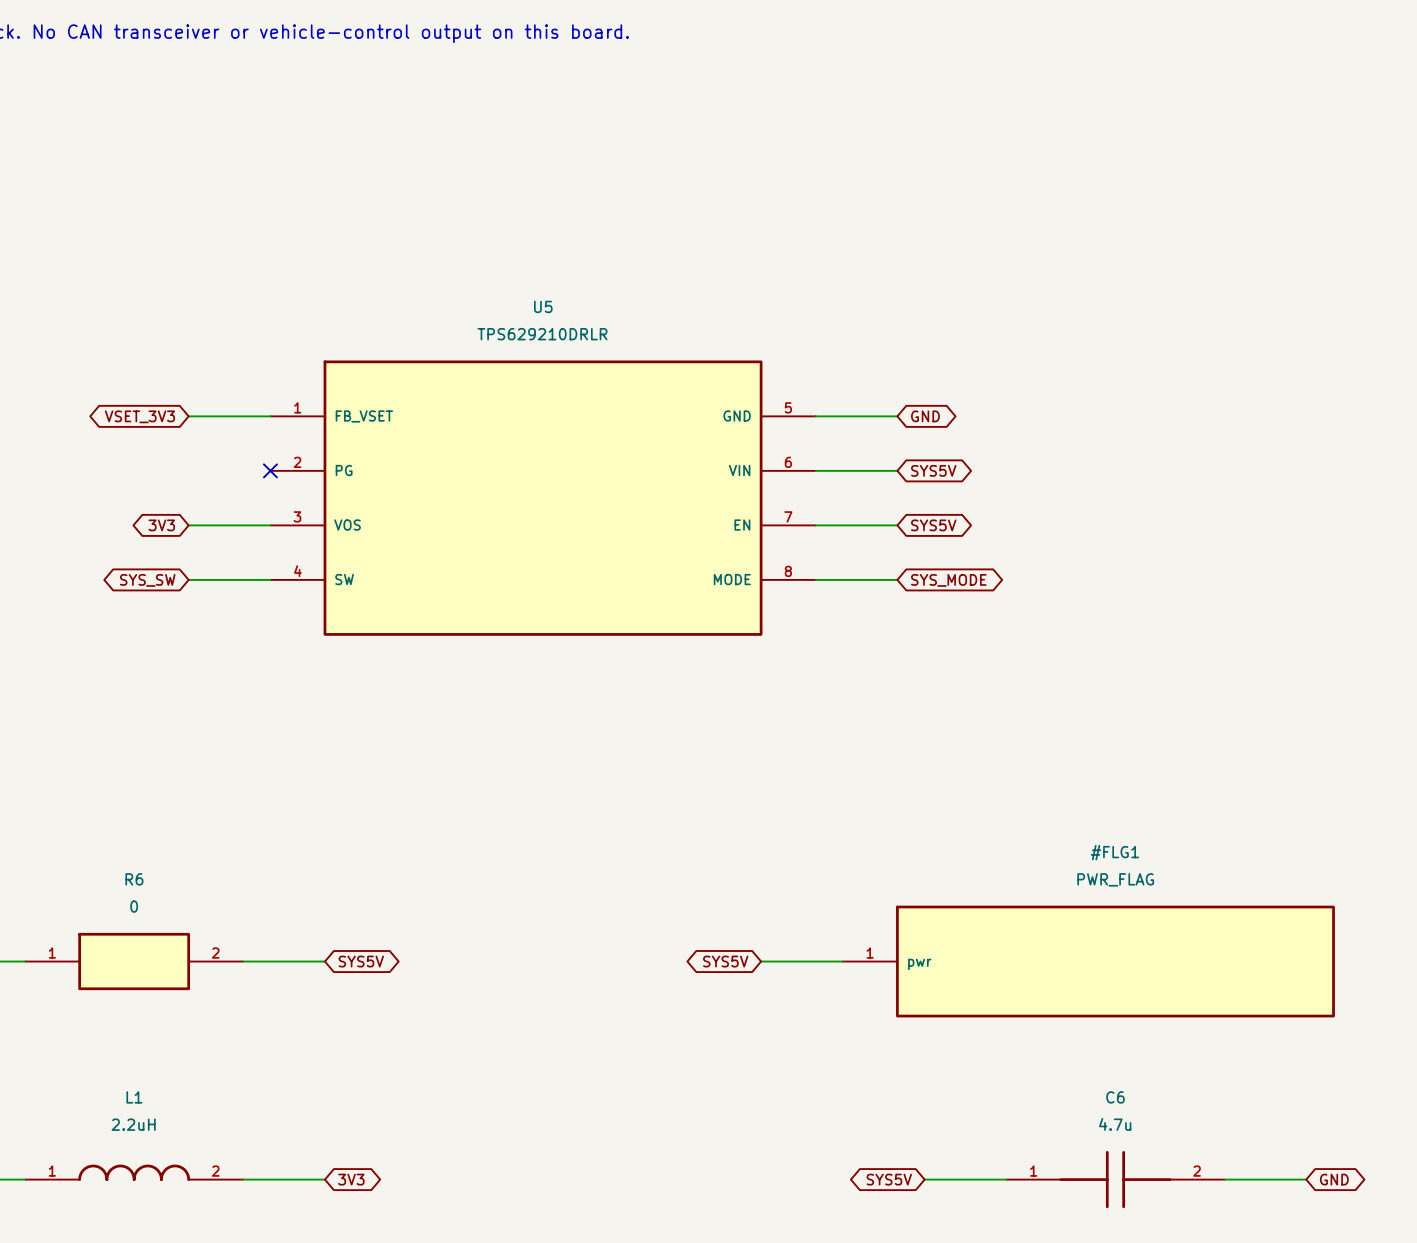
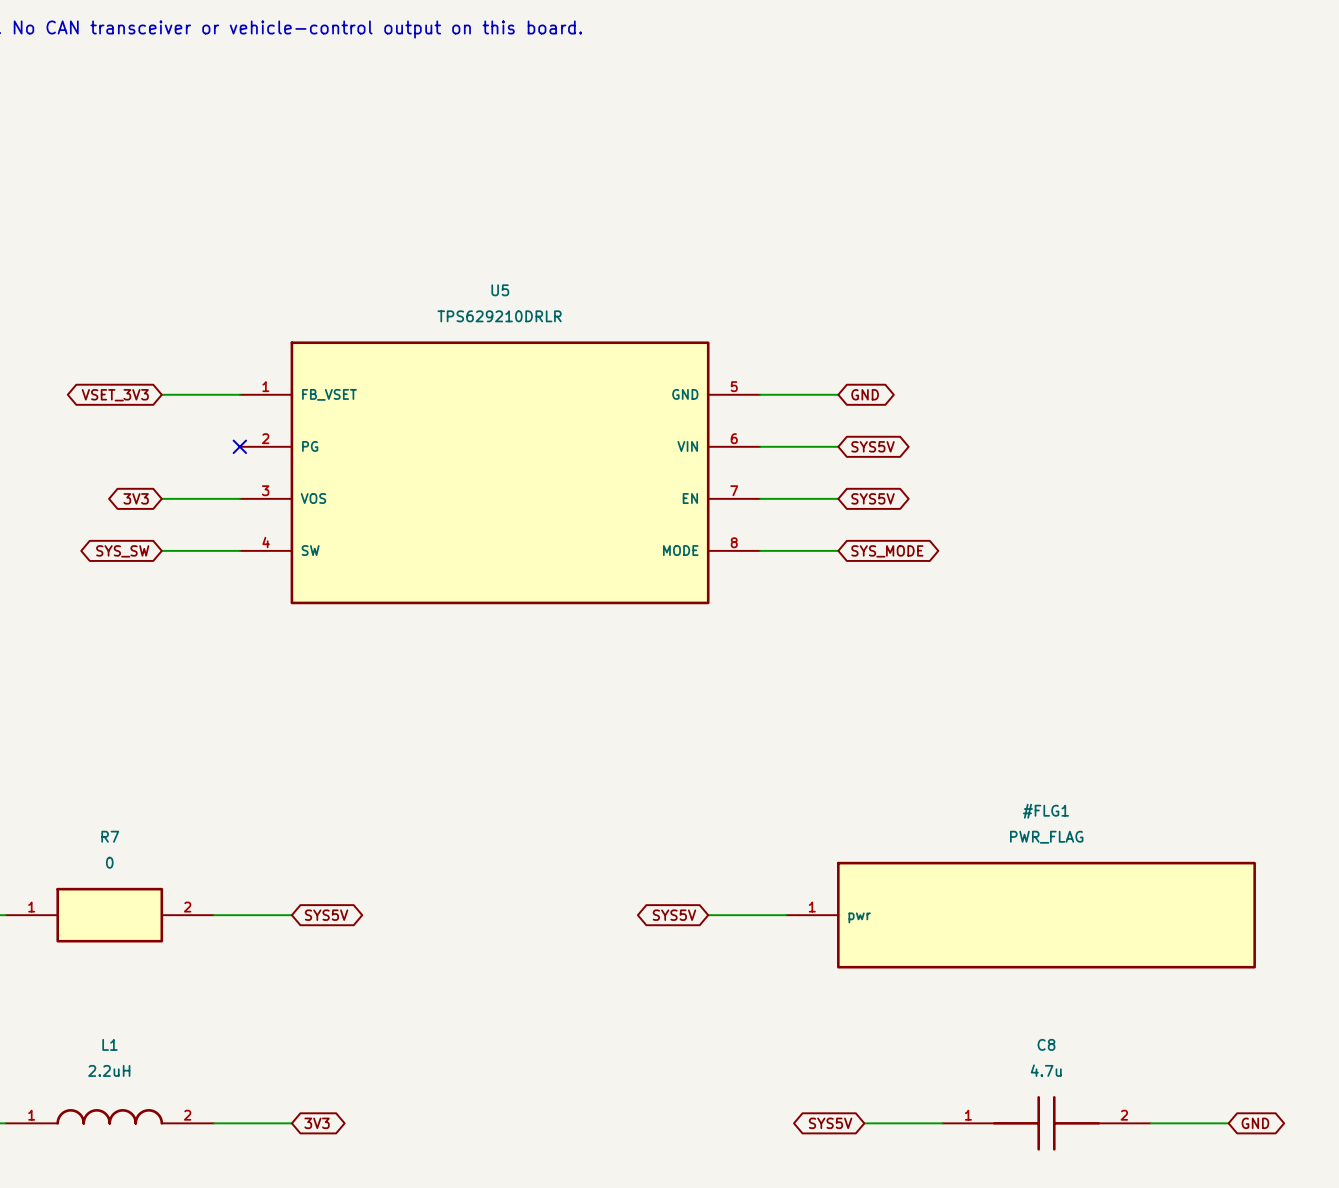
R6 name: R6 (134, 879) -> R7 (110, 836)
C6 name: C6 (1115, 1097) -> C8 (1046, 1044)

